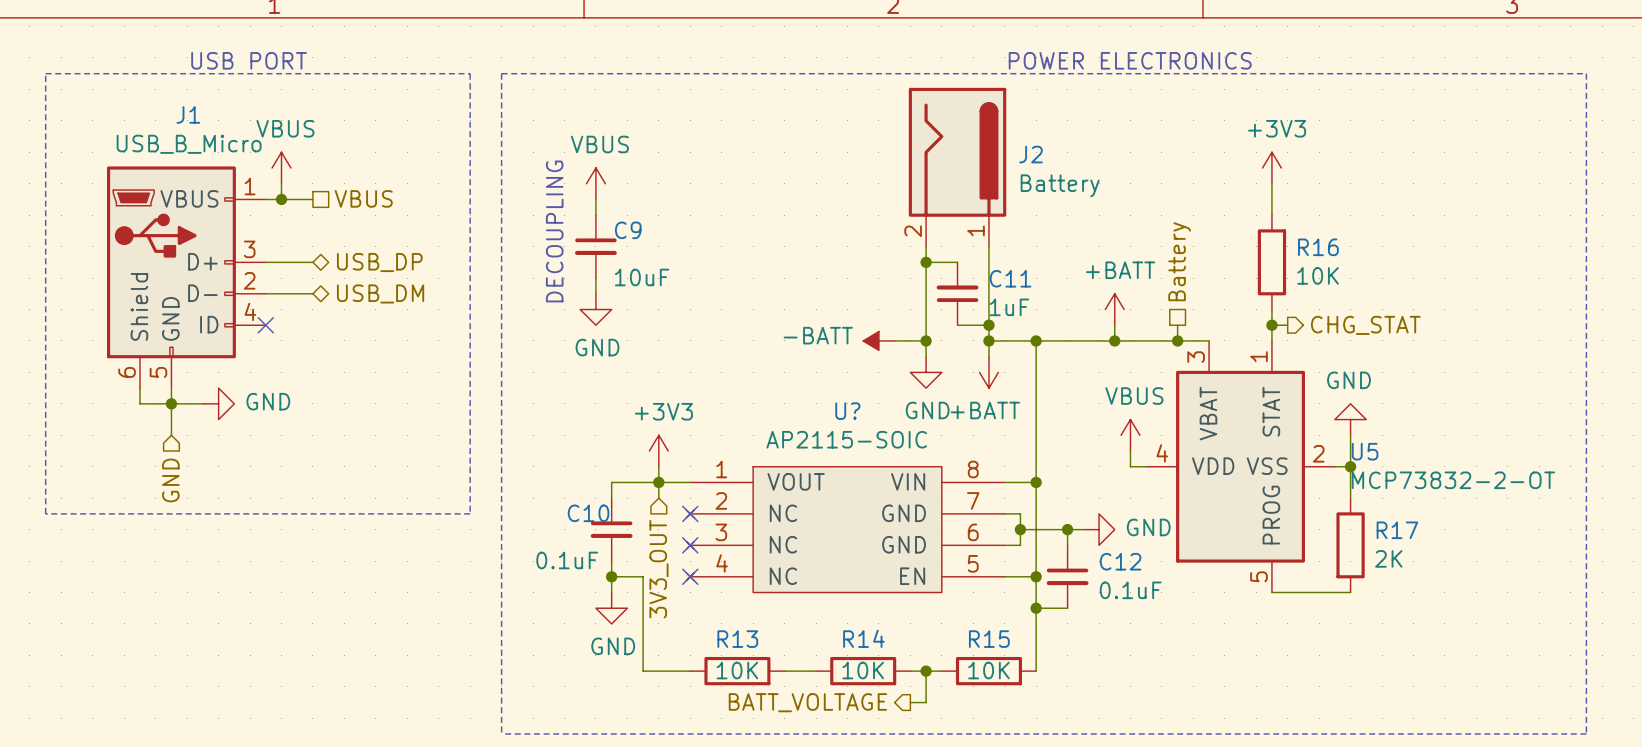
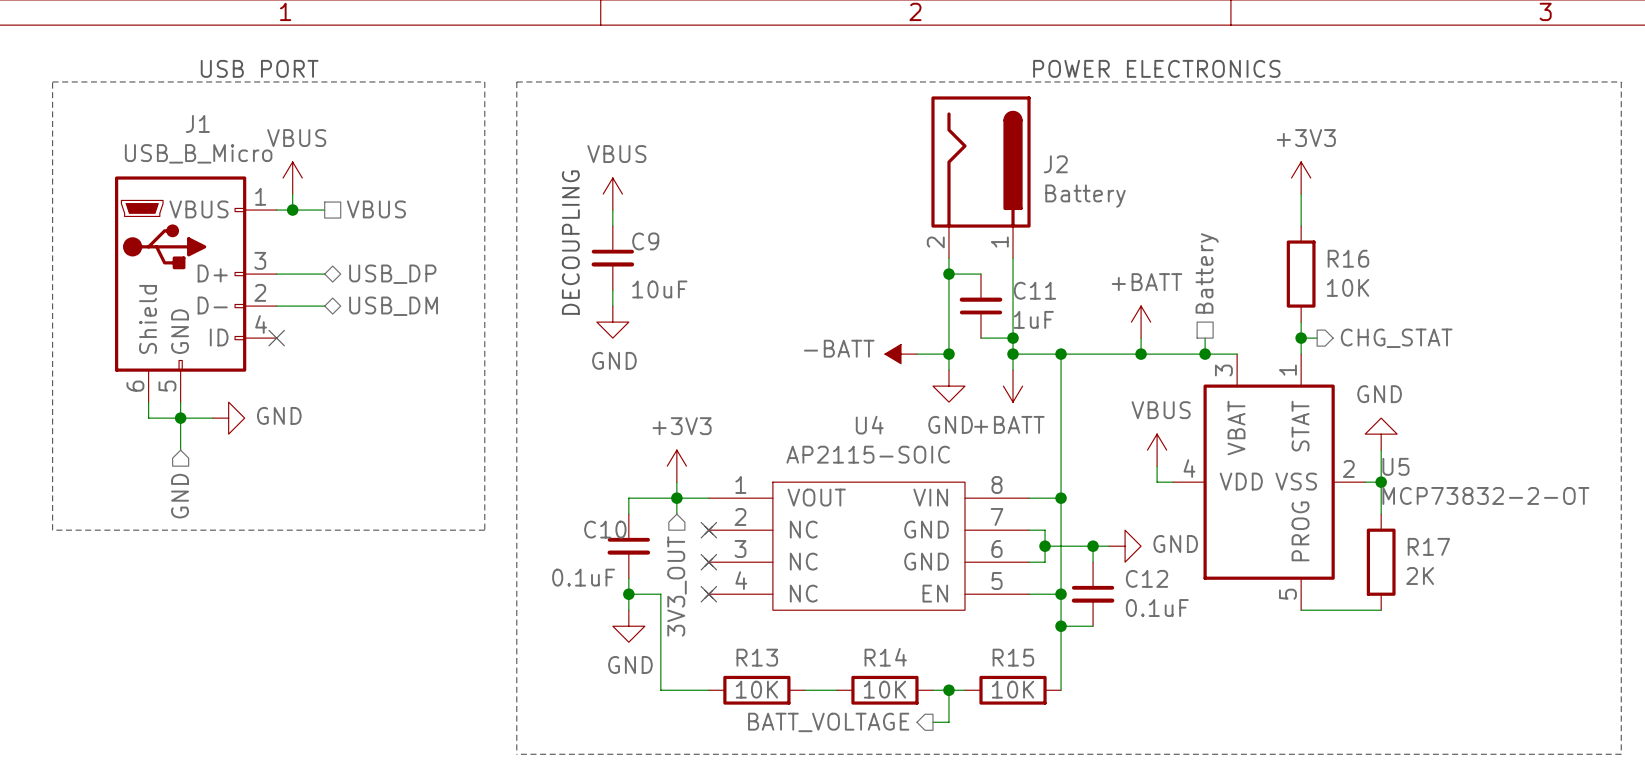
U? name: U? (847, 411) -> U4 (869, 425)

